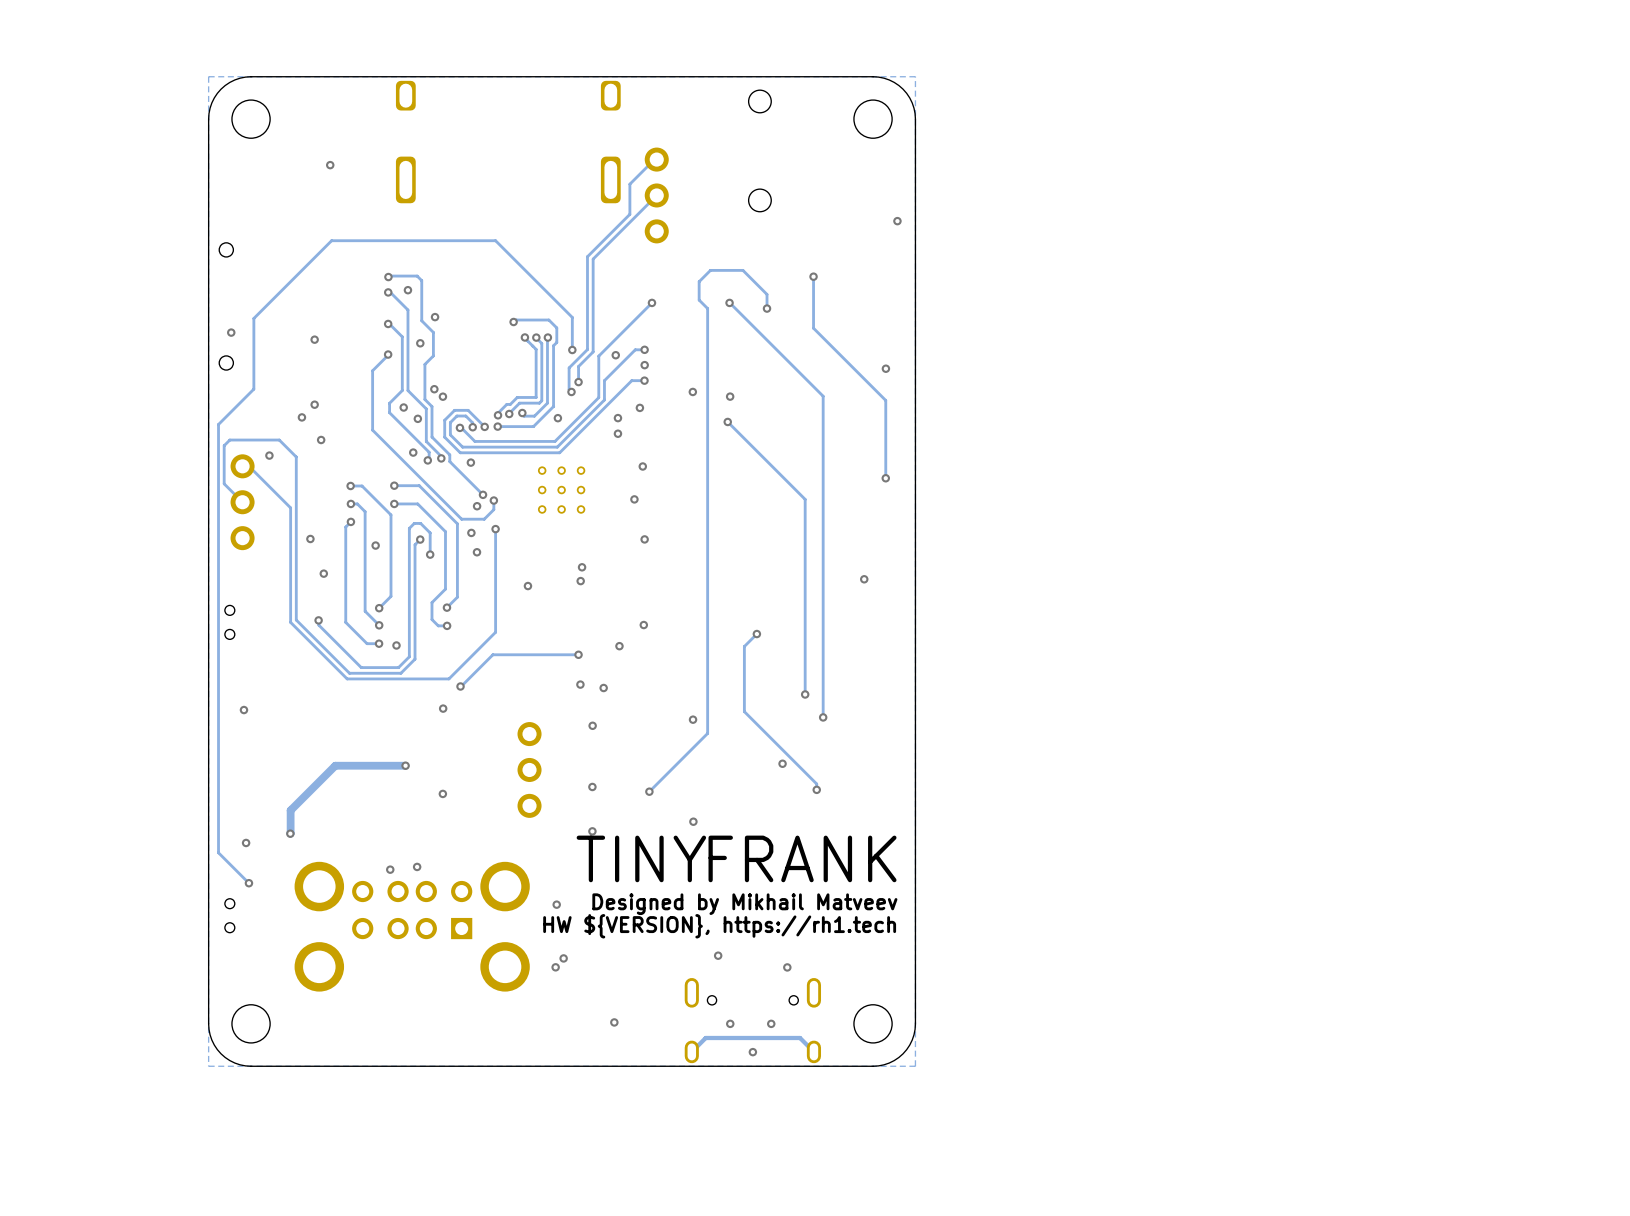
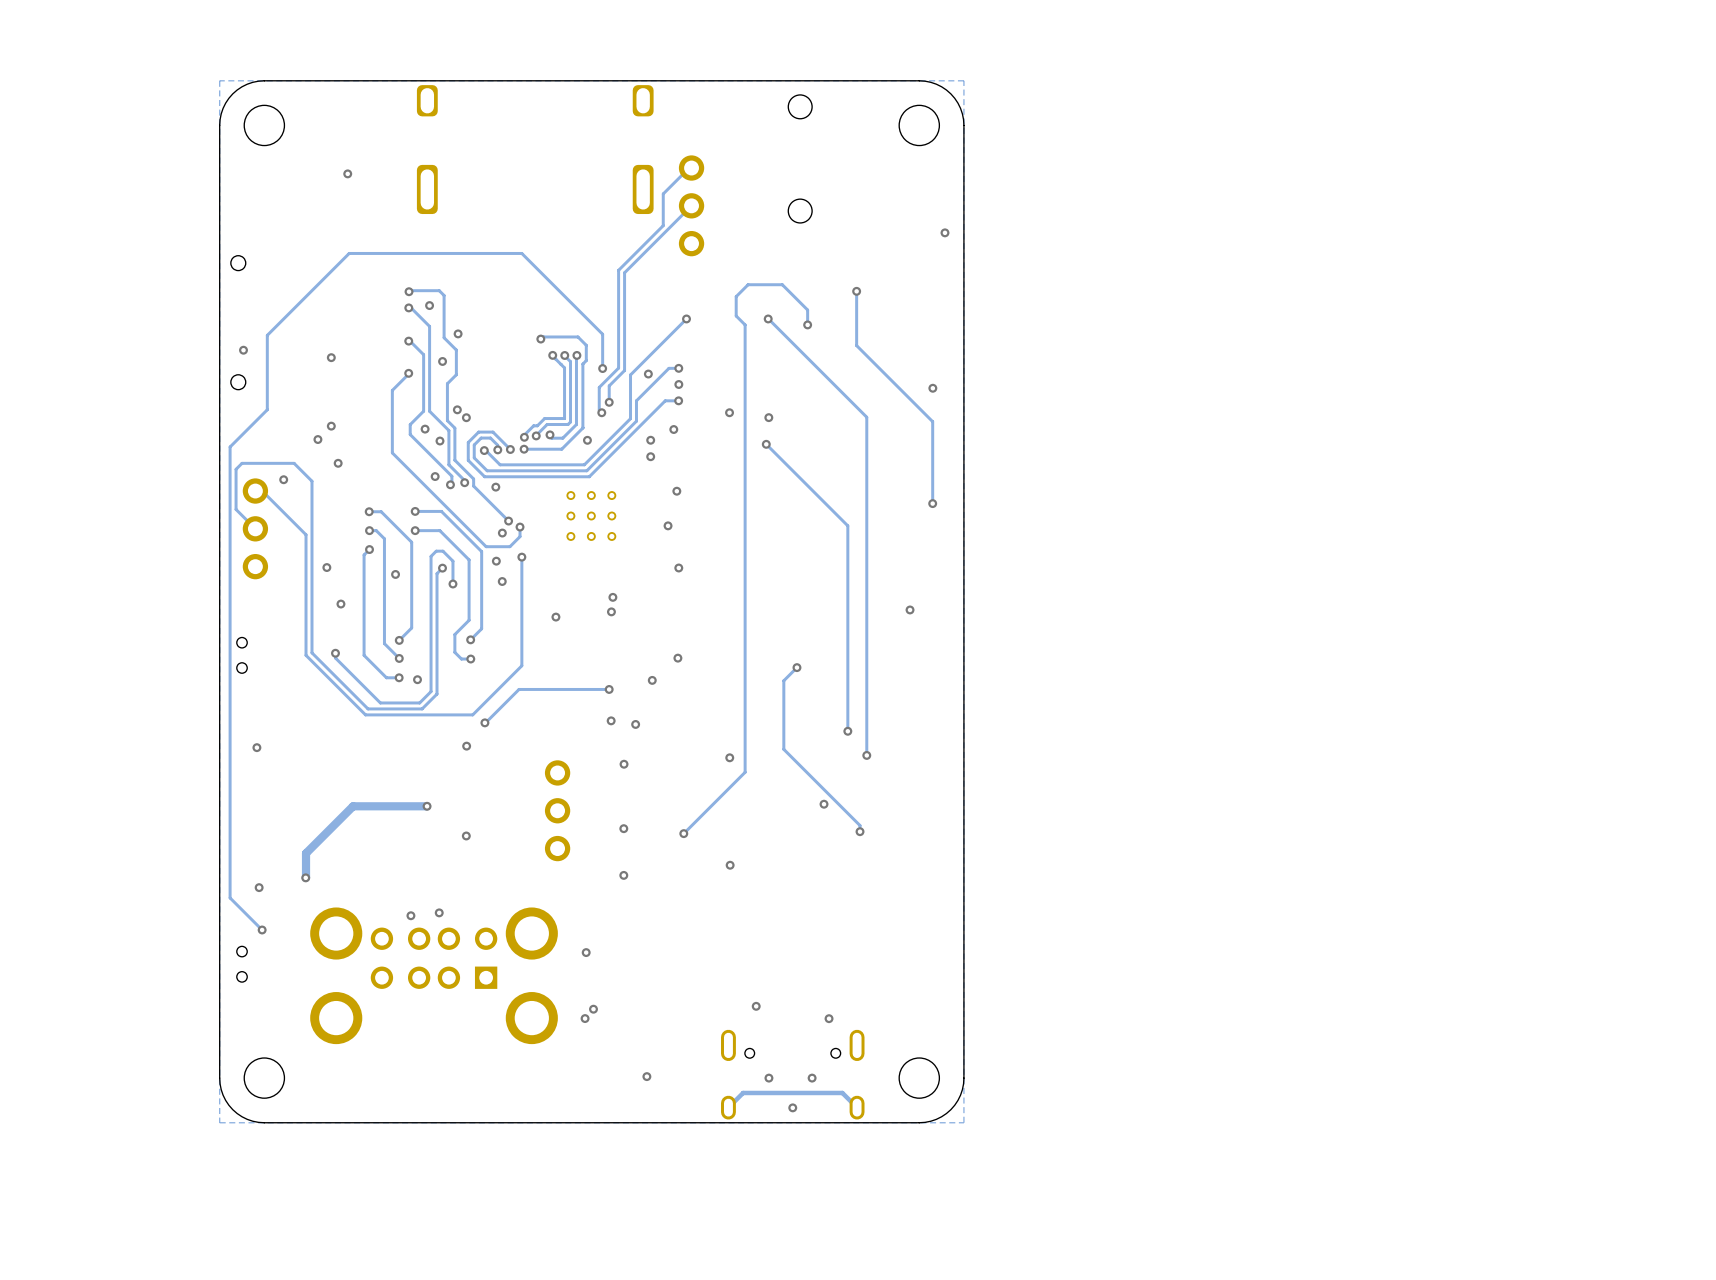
text: TINY (641, 858) -> none
text: FRANK (802, 858) -> none
text: Designed by Mikhail Matveev (744, 904) -> none
text: HW ${VERSION}, https://rh1.tech (719, 926) -> none

